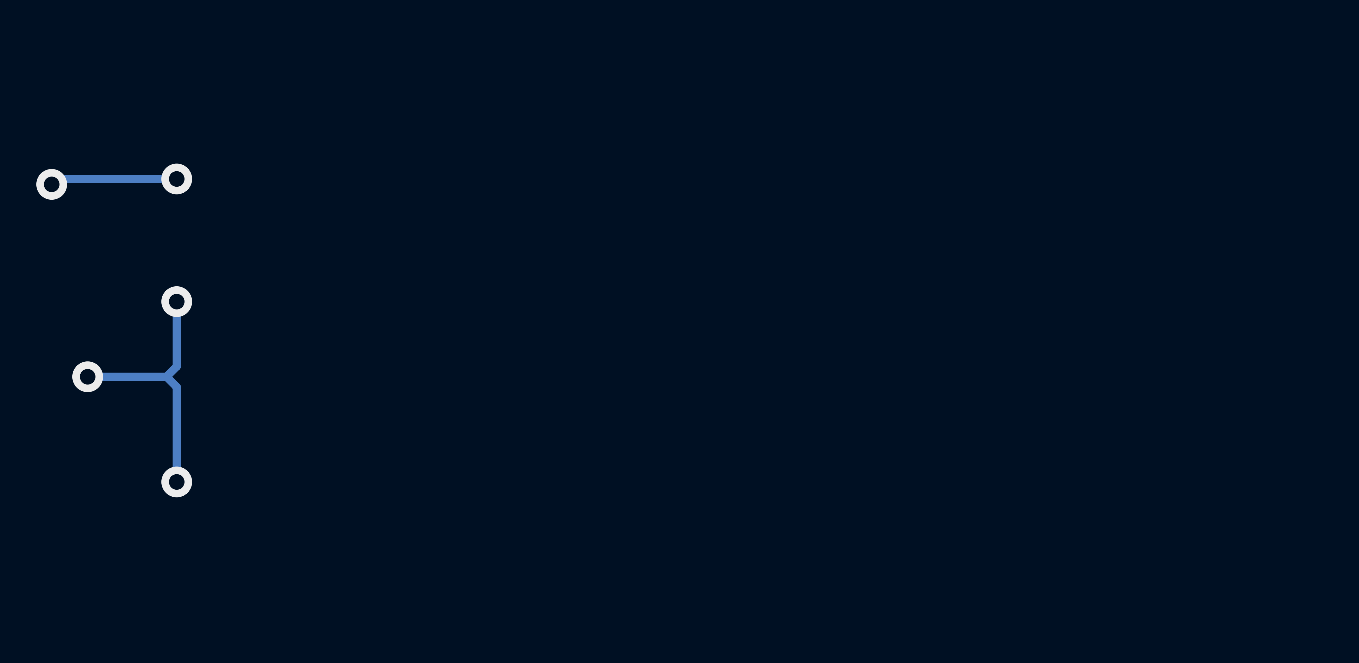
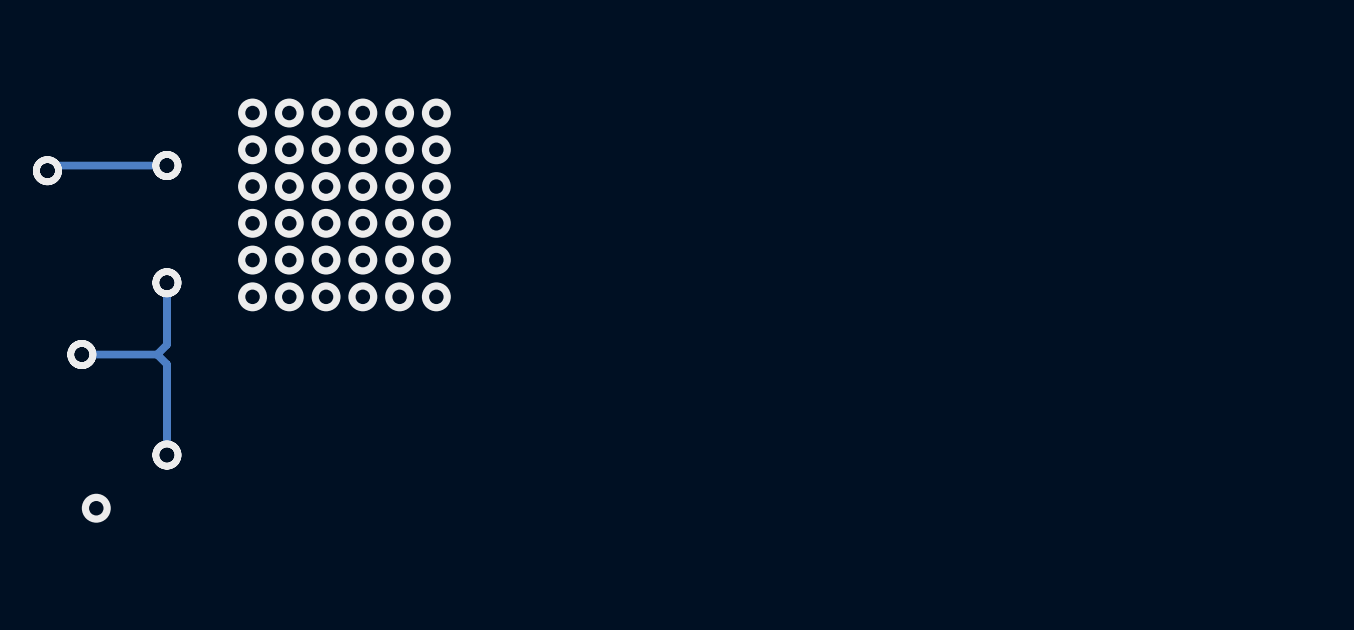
via: none -> (252, 113)
via: none -> (289, 113)
via: none -> (326, 113)
via: none -> (362, 113)
via: none -> (399, 113)
via: none -> (436, 113)
via: none -> (252, 149)
via: none -> (289, 149)
via: none -> (326, 149)
via: none -> (362, 149)
via: none -> (399, 149)
via: none -> (436, 149)
via: none -> (252, 186)
via: none -> (289, 186)
via: none -> (326, 186)
via: none -> (362, 186)
via: none -> (399, 186)
via: none -> (436, 186)
via: none -> (252, 223)
via: none -> (289, 223)
via: none -> (326, 223)
via: none -> (362, 223)
via: none -> (399, 223)
via: none -> (436, 223)
via: none -> (252, 260)
via: none -> (289, 260)
via: none -> (326, 260)
via: none -> (362, 260)
via: none -> (399, 260)
via: none -> (436, 260)
via: none -> (252, 296)
via: none -> (289, 296)
via: none -> (326, 296)
via: none -> (362, 296)
via: none -> (399, 296)
via: none -> (436, 296)
via: none -> (96, 508)

